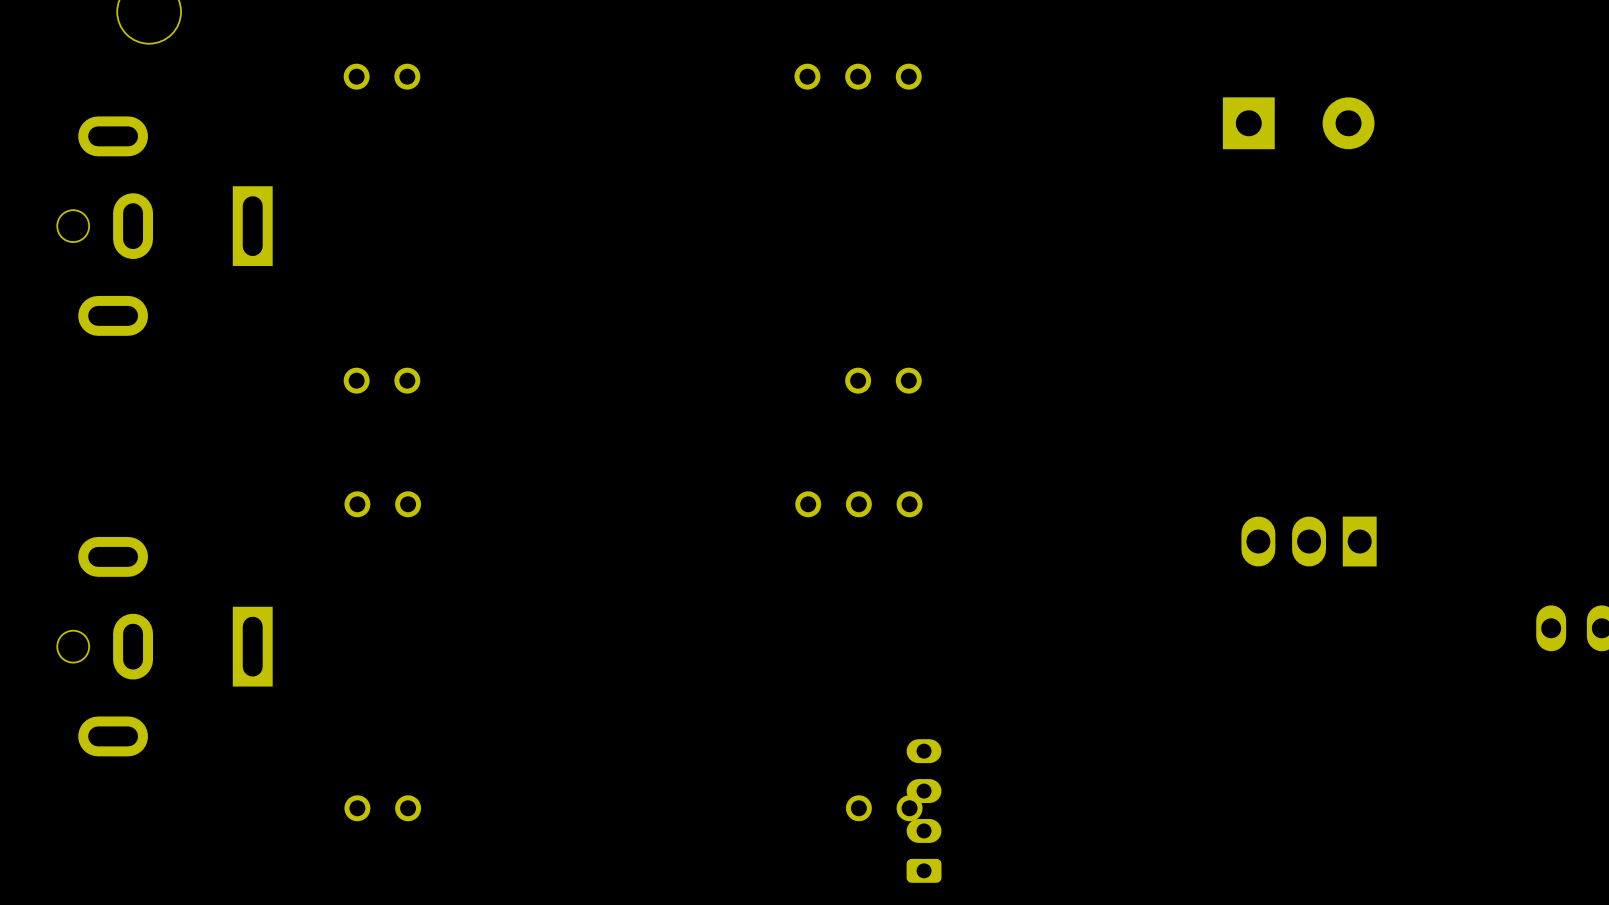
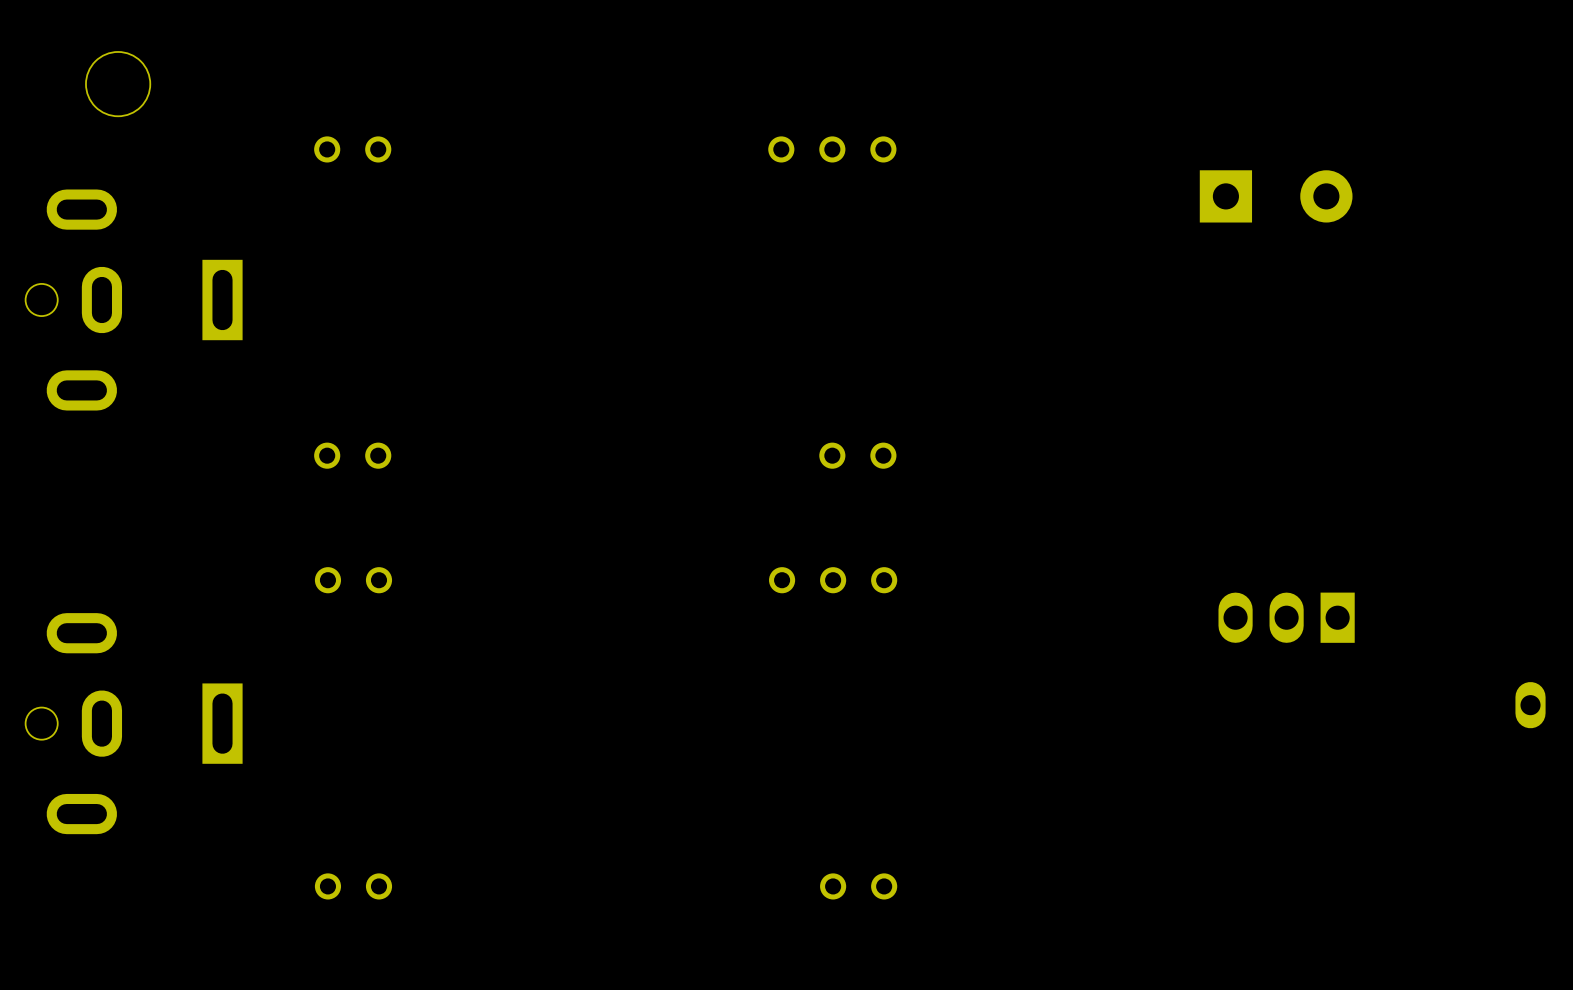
part: (924, 811) -> none

